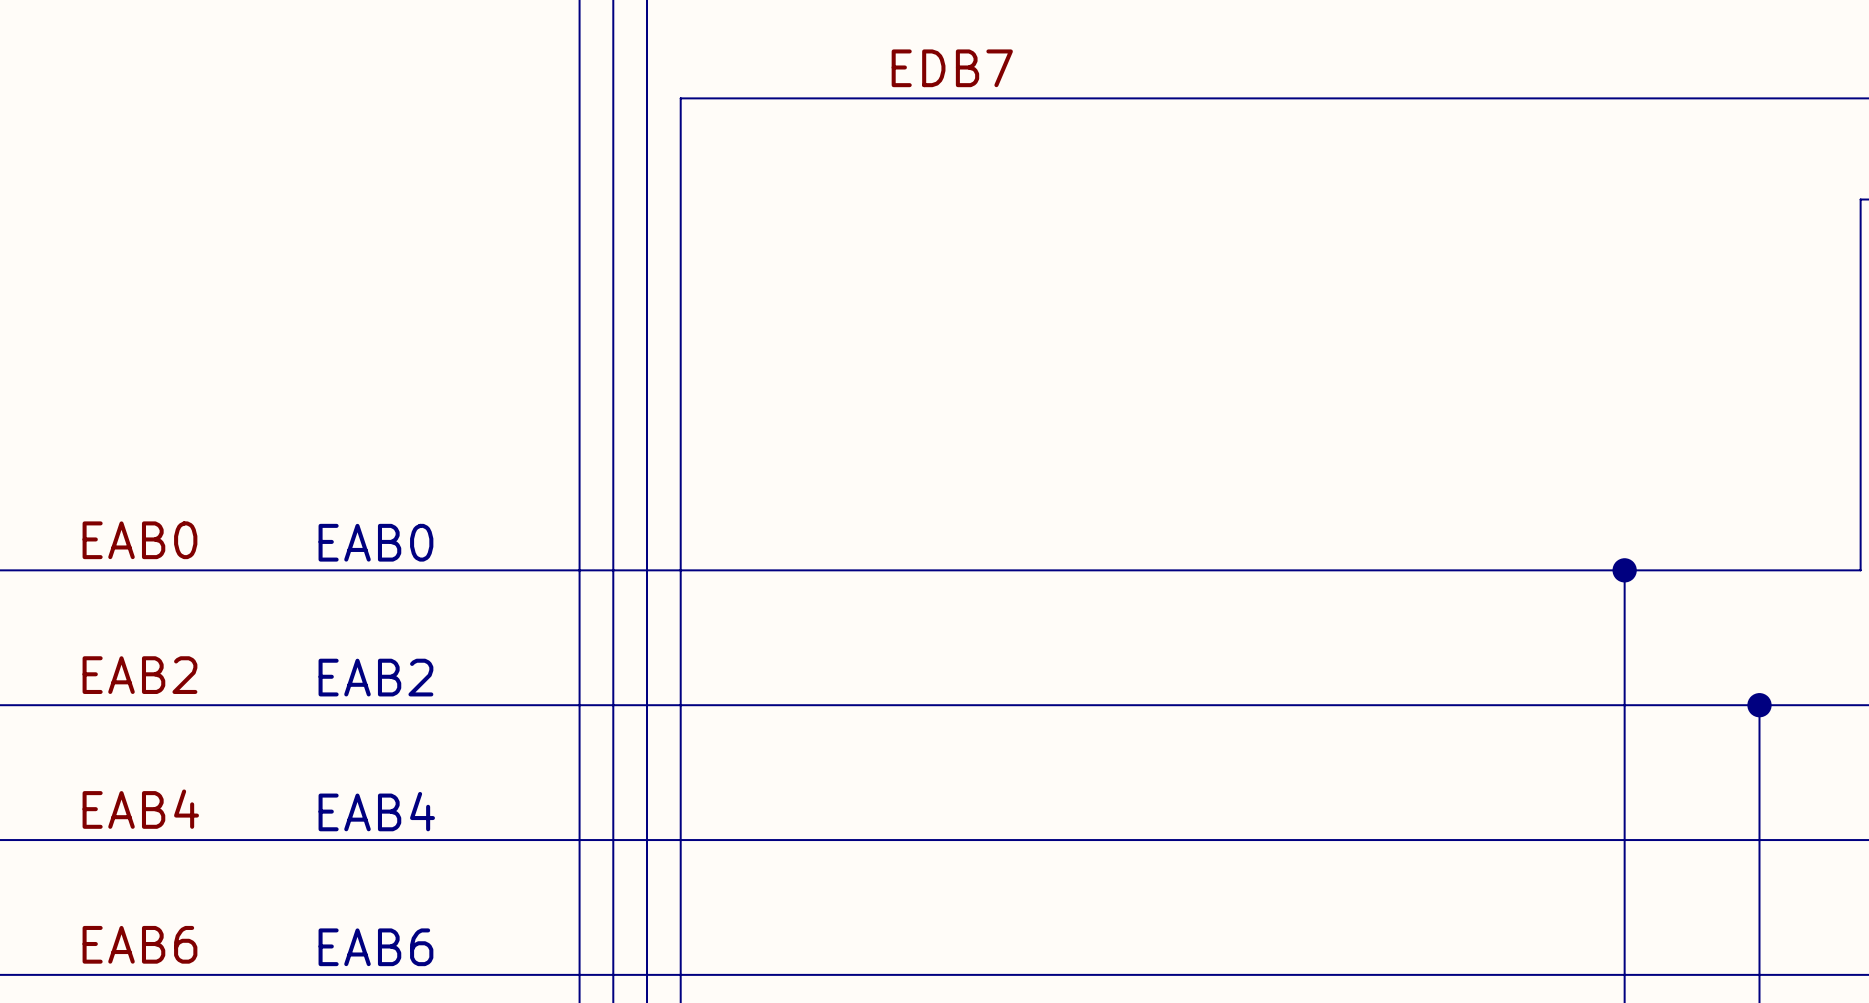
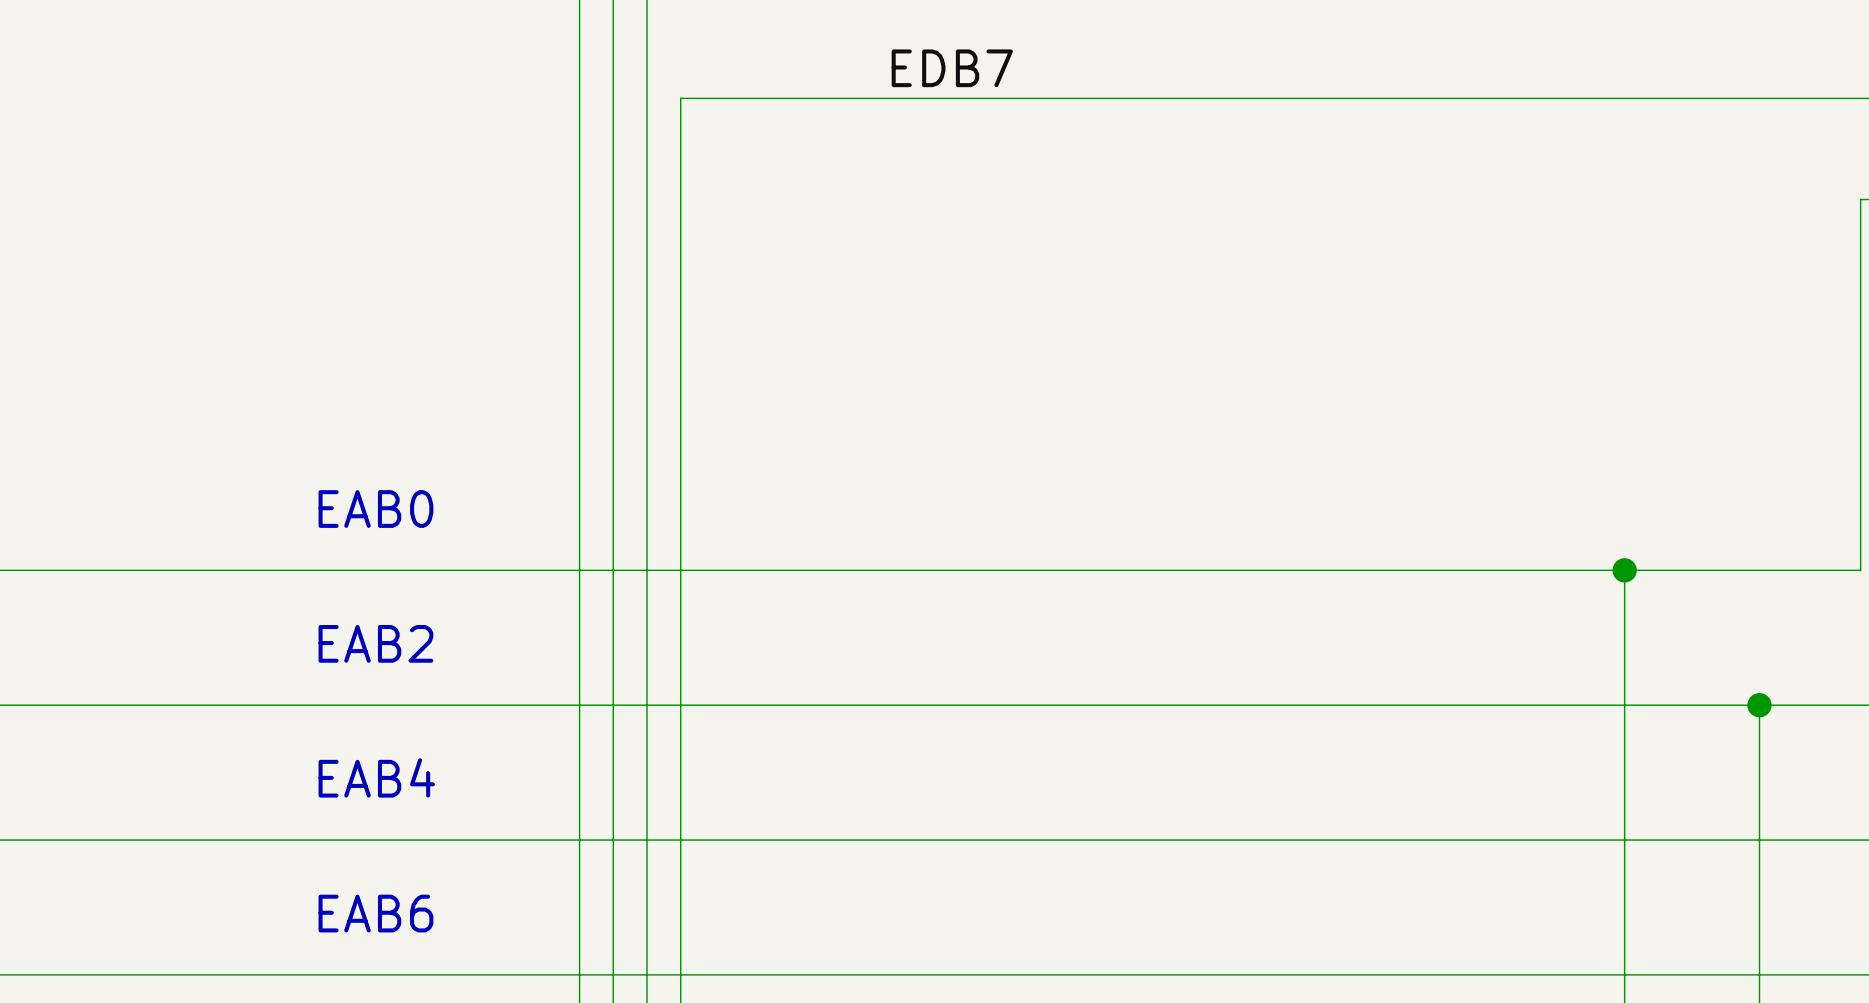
label: EAB0 (139, 540) -> none
text position: EAB0 (375, 542) -> EAB0 (375, 509)
label: EAB2 (139, 675) -> none
text position: EAB2 (375, 677) -> EAB2 (375, 643)
label: EAB4 (140, 809) -> none
text position: EAB4 (376, 811) -> EAB4 (376, 777)
label: EAB6 (139, 944) -> none
text position: EAB6 (375, 947) -> EAB6 (375, 913)

